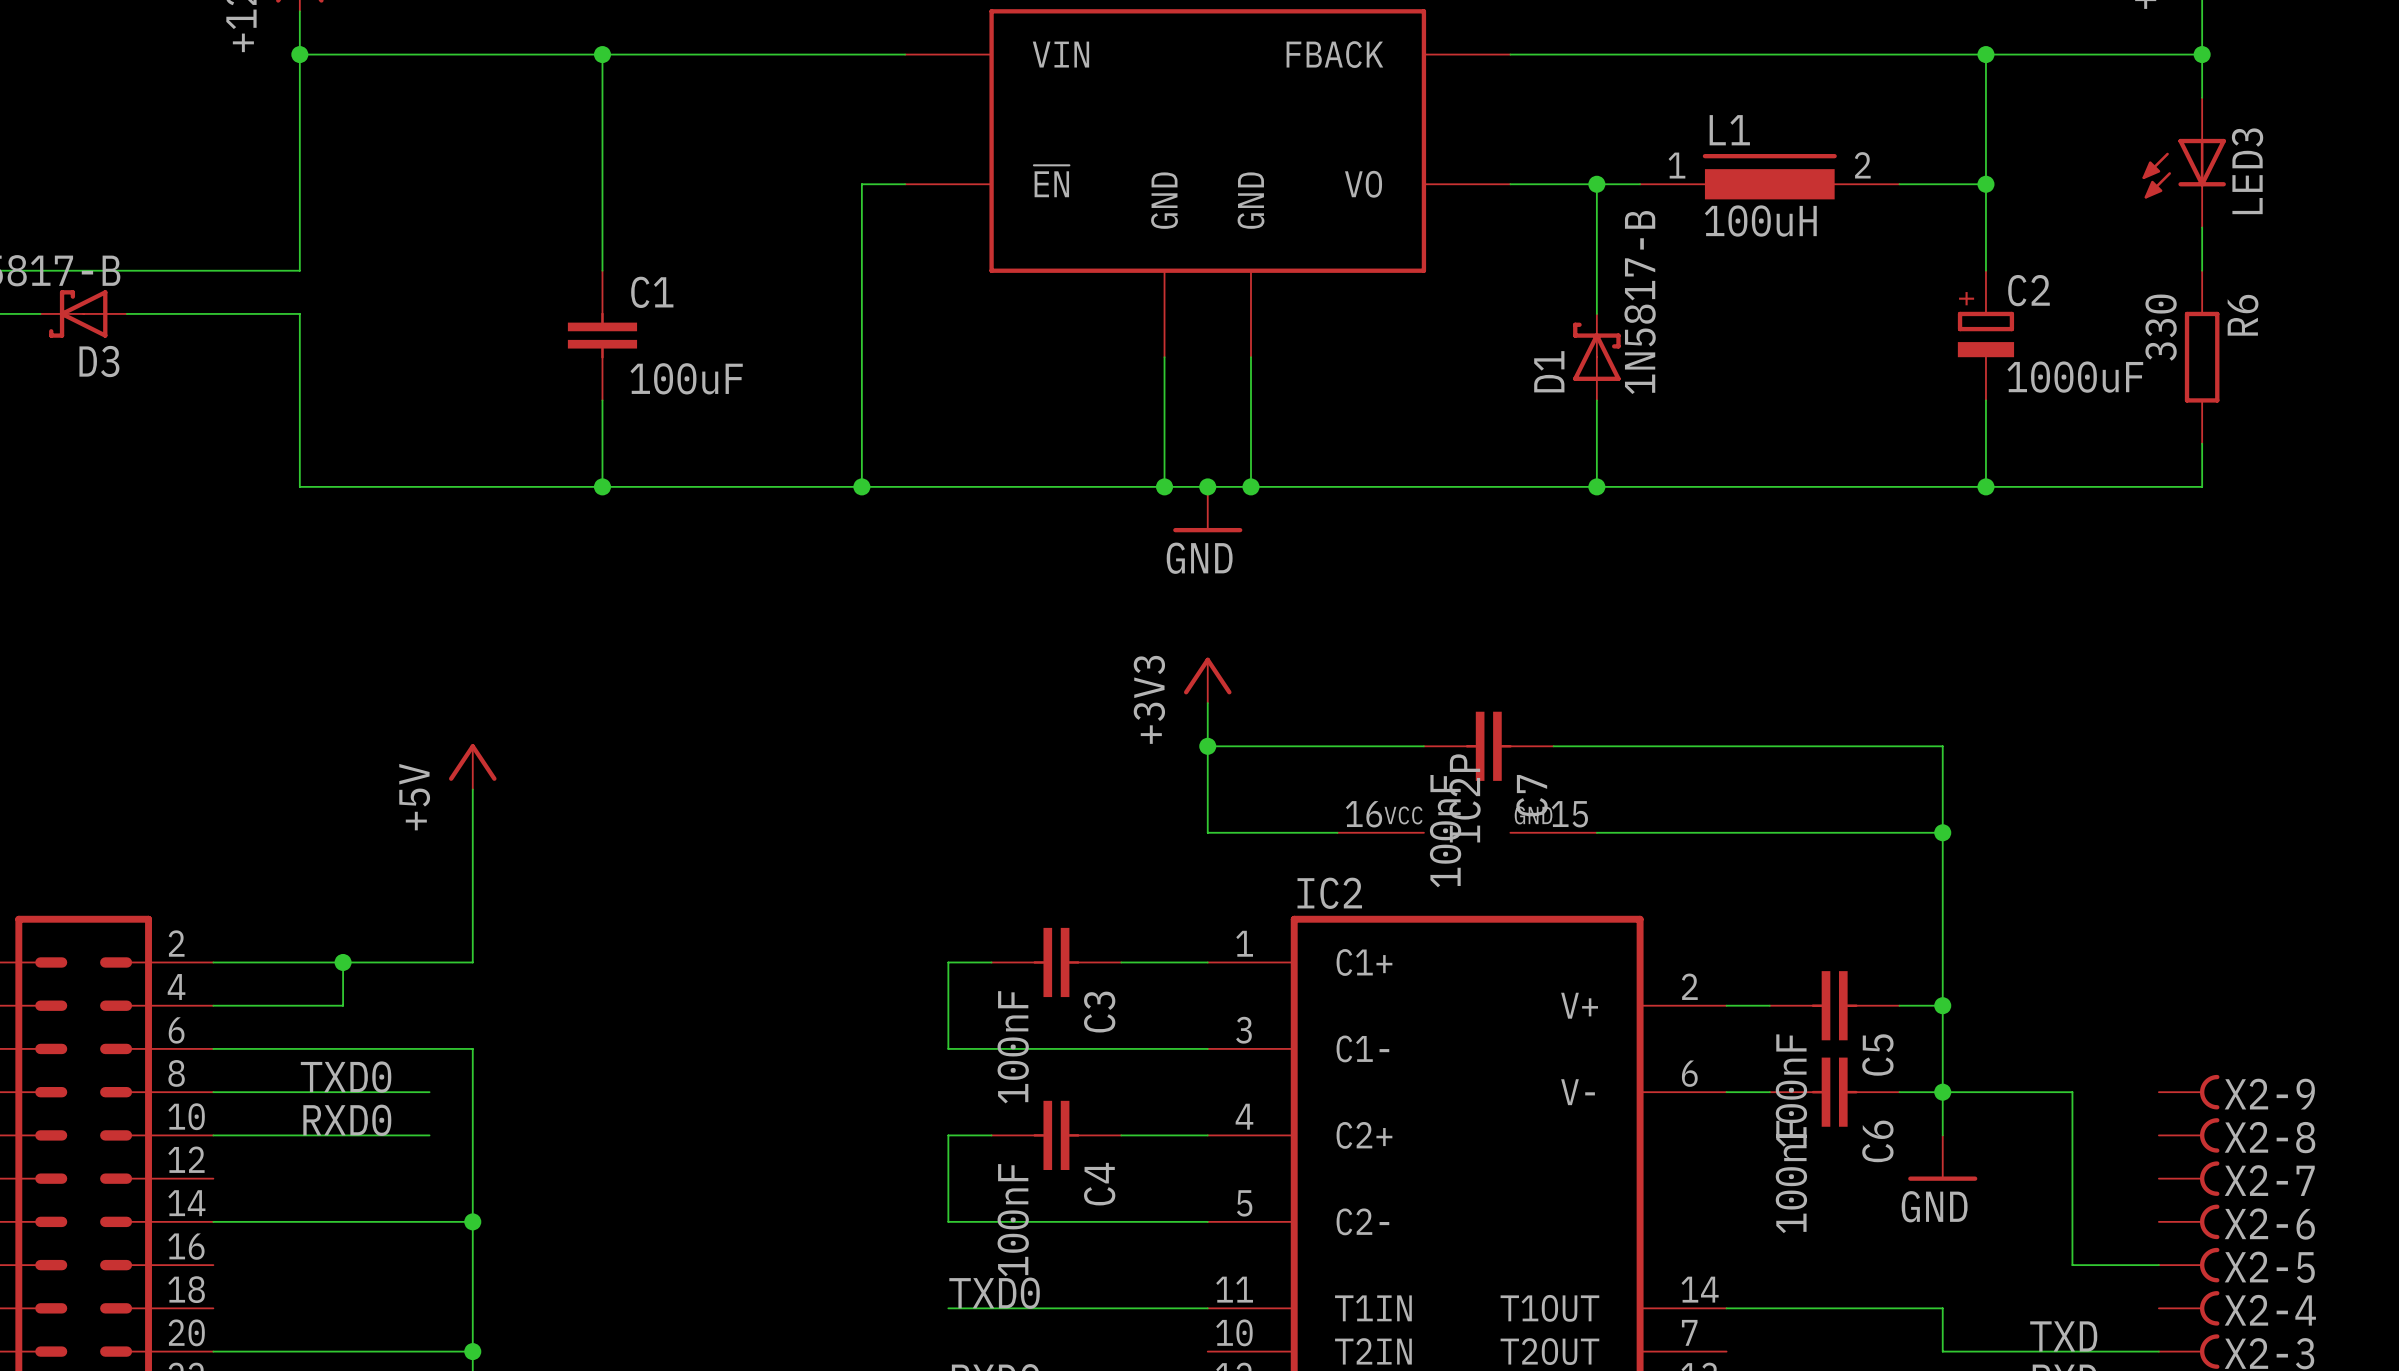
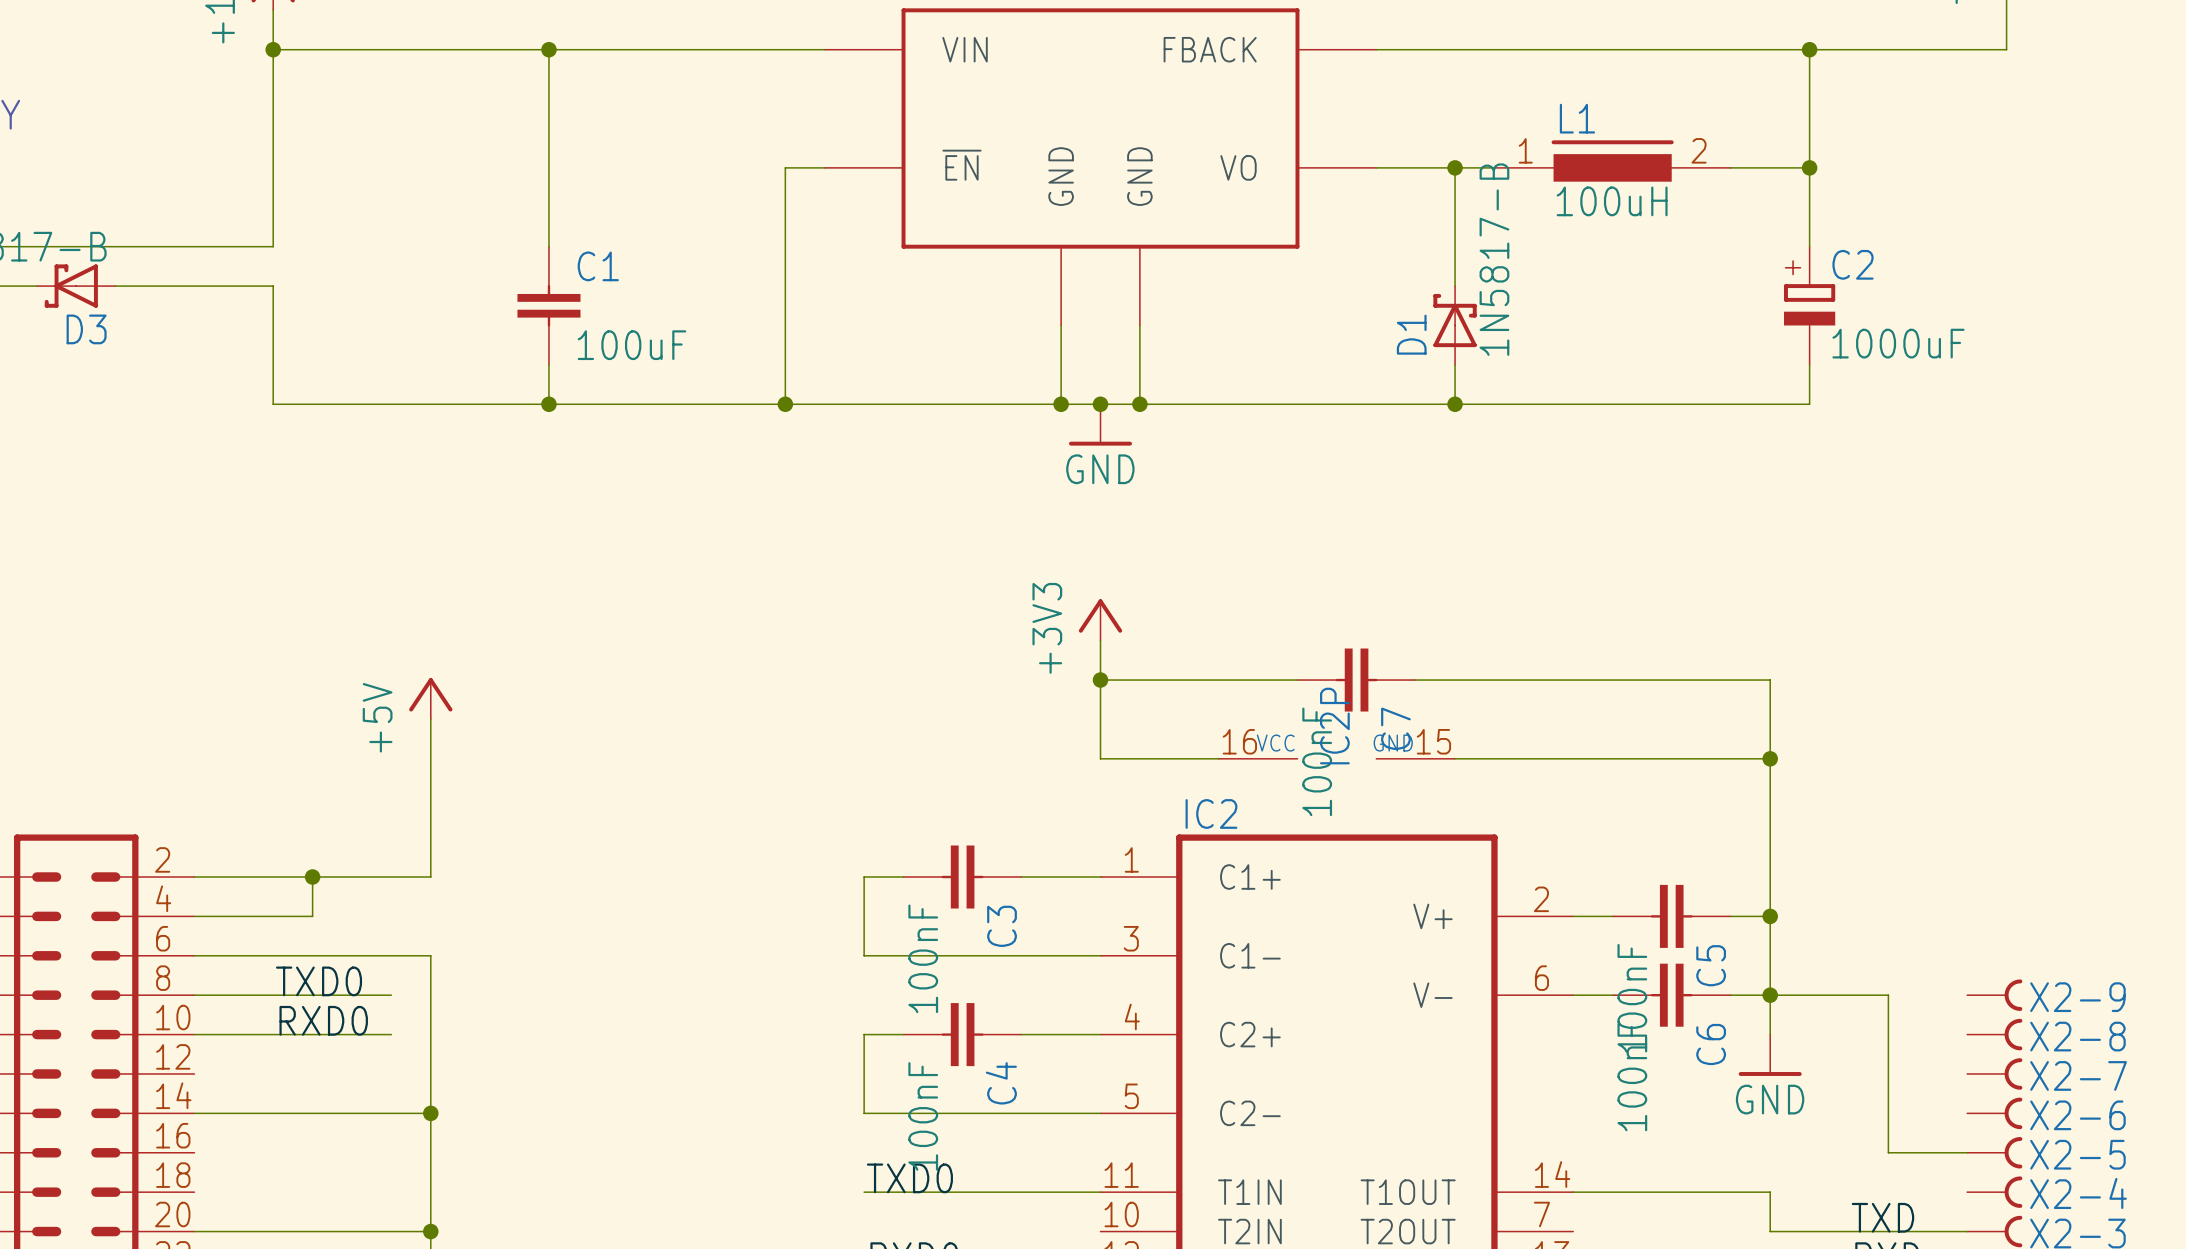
wire: (2202, 54) (2202, 97) -> none
junction: (2202, 54) -> none
LED3: (2184, 162) -> none
wire: (2202, 227) (2202, 270) -> none
R6: 330 (2202, 357) -> none
wire: (299, 443) (299, 486) (2202, 486) (2202, 443) -> (273, 404) (1809, 404)
wire: (602, 443) (602, 486) -> none
wire: (861, 443) (861, 486) -> none
wire: (1164, 443) (1164, 486) -> none
junction: none -> (1061, 404)
junction: none -> (1100, 404)
wire: (1250, 443) (1250, 486) -> none
junction: none -> (1139, 404)
wire: (1596, 443) (1596, 486) -> none
wire: (1985, 443) (1985, 486) -> none
junction position: (602, 486) -> (548, 404)
junction position: (861, 486) -> (785, 404)
junction: (1164, 486) -> none
junction: (1207, 486) -> none
junction: (1250, 486) -> none
junction position: (1596, 486) -> (1455, 404)
junction: (1985, 486) -> none
power symbol position: GND (1207, 509) -> GND (1100, 424)

